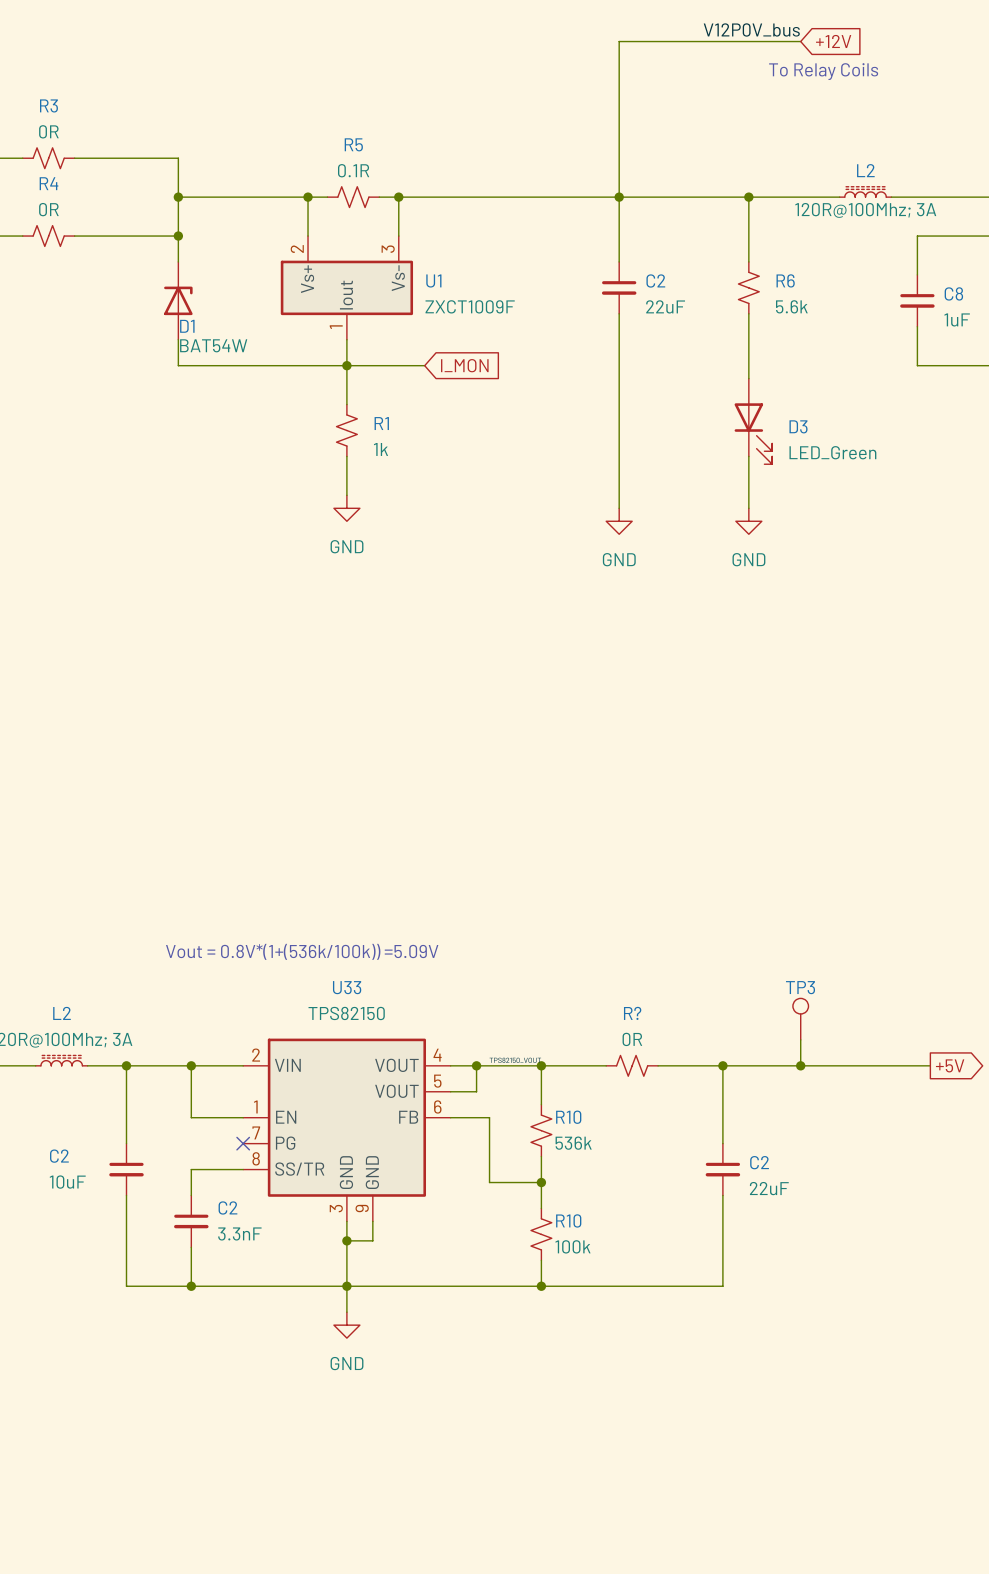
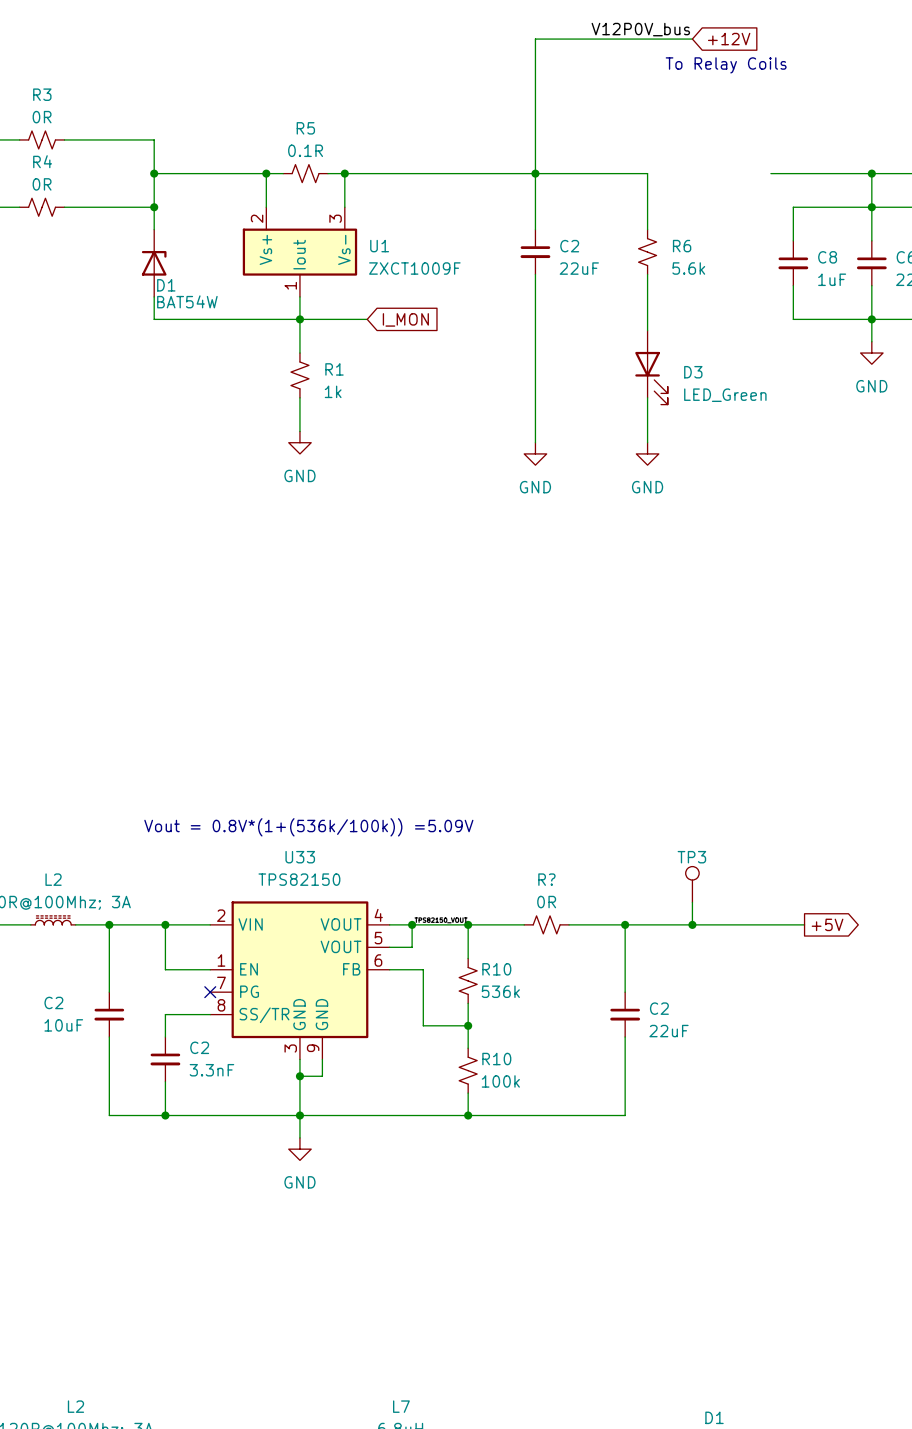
L2: 120R@100Mhz; 3A (865, 191) -> none
wire: (748, 197) (839, 197) -> none
junction: (748, 197) -> none

